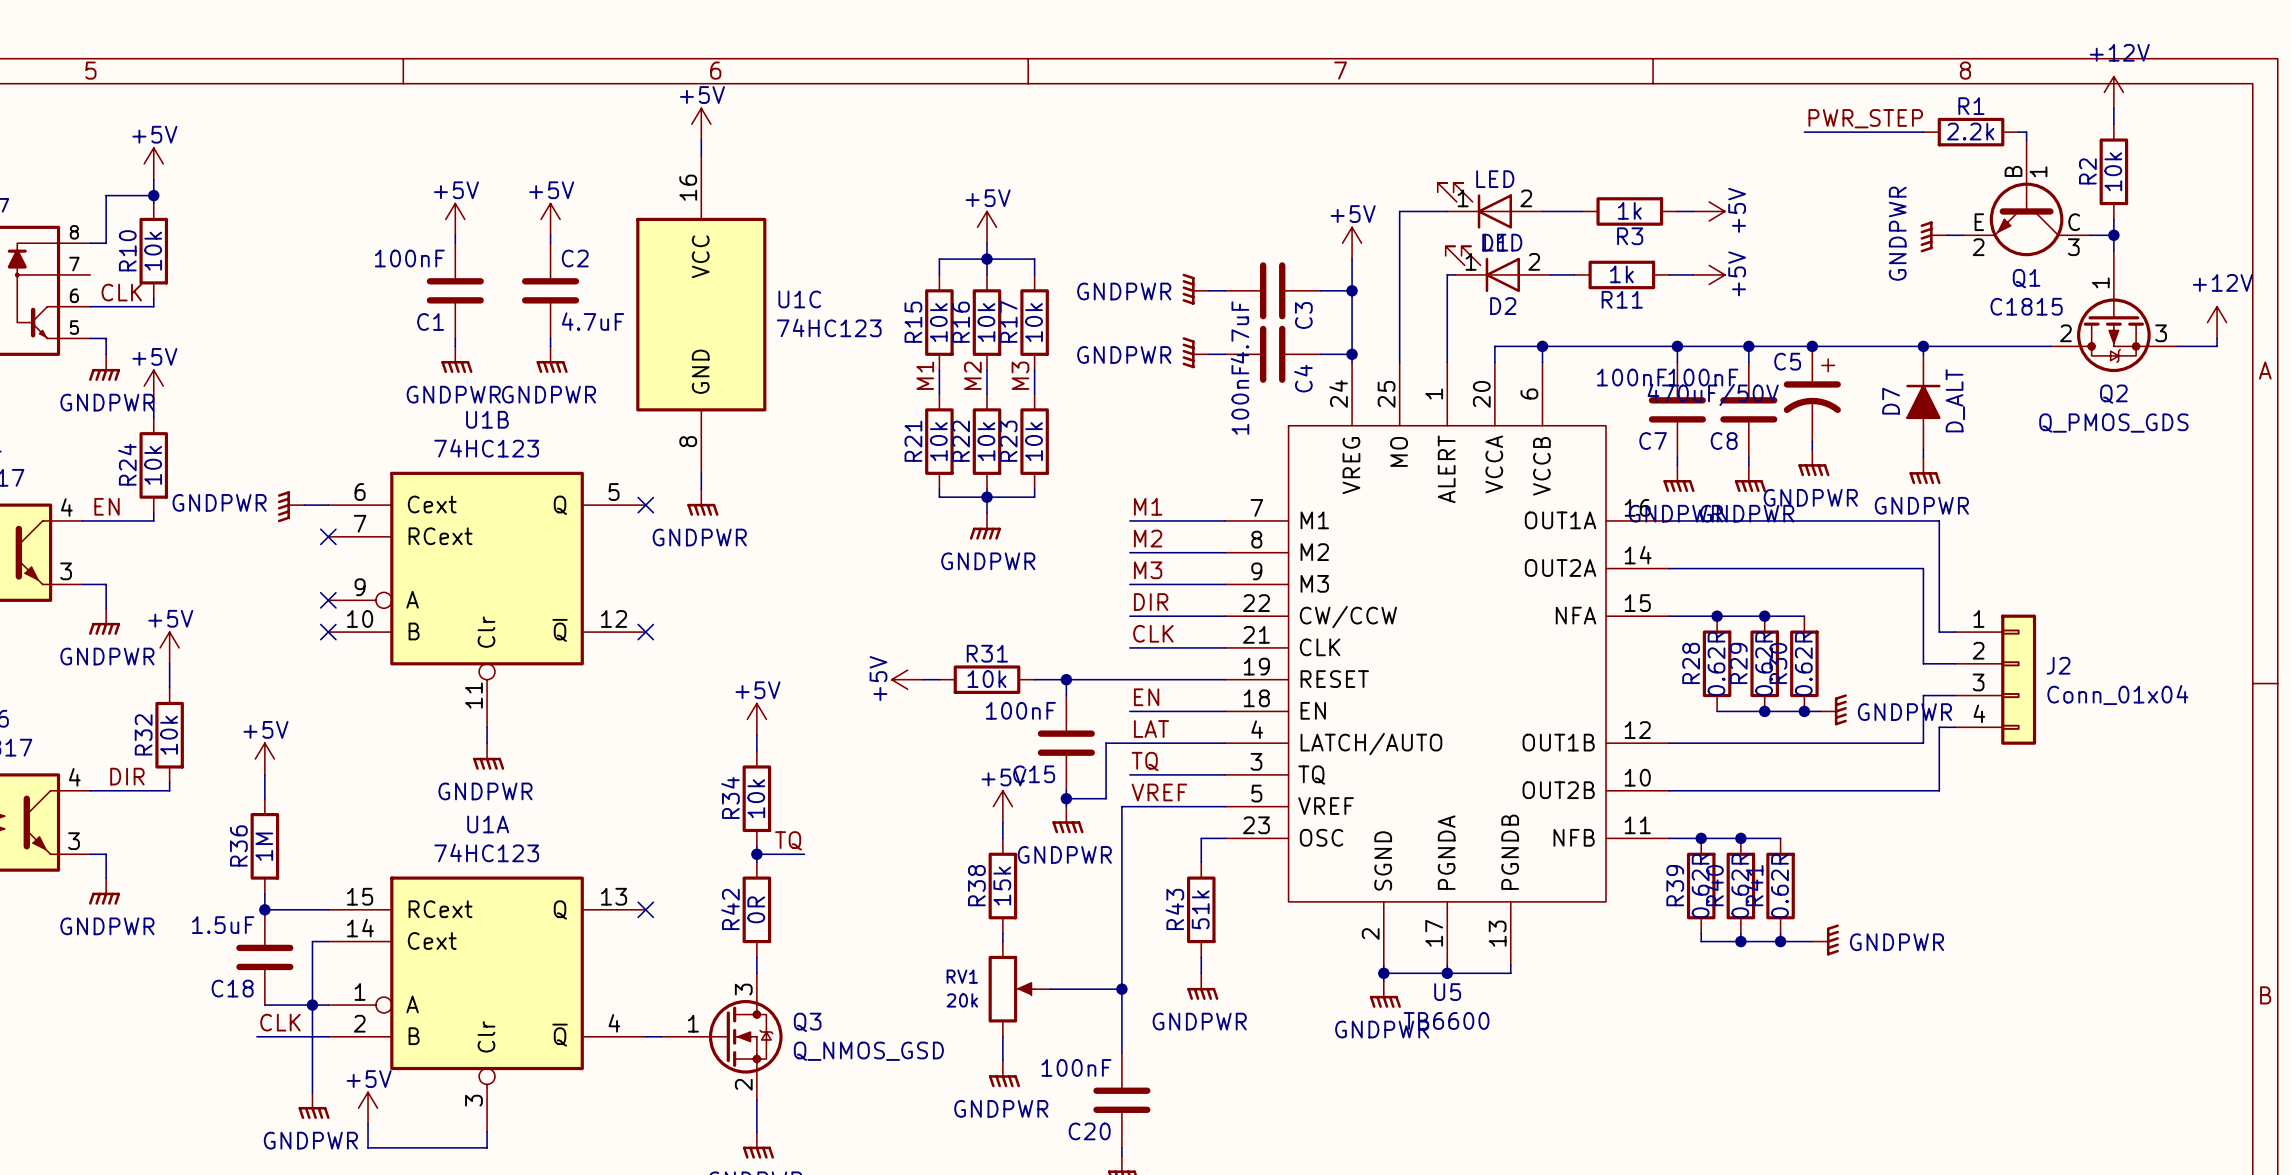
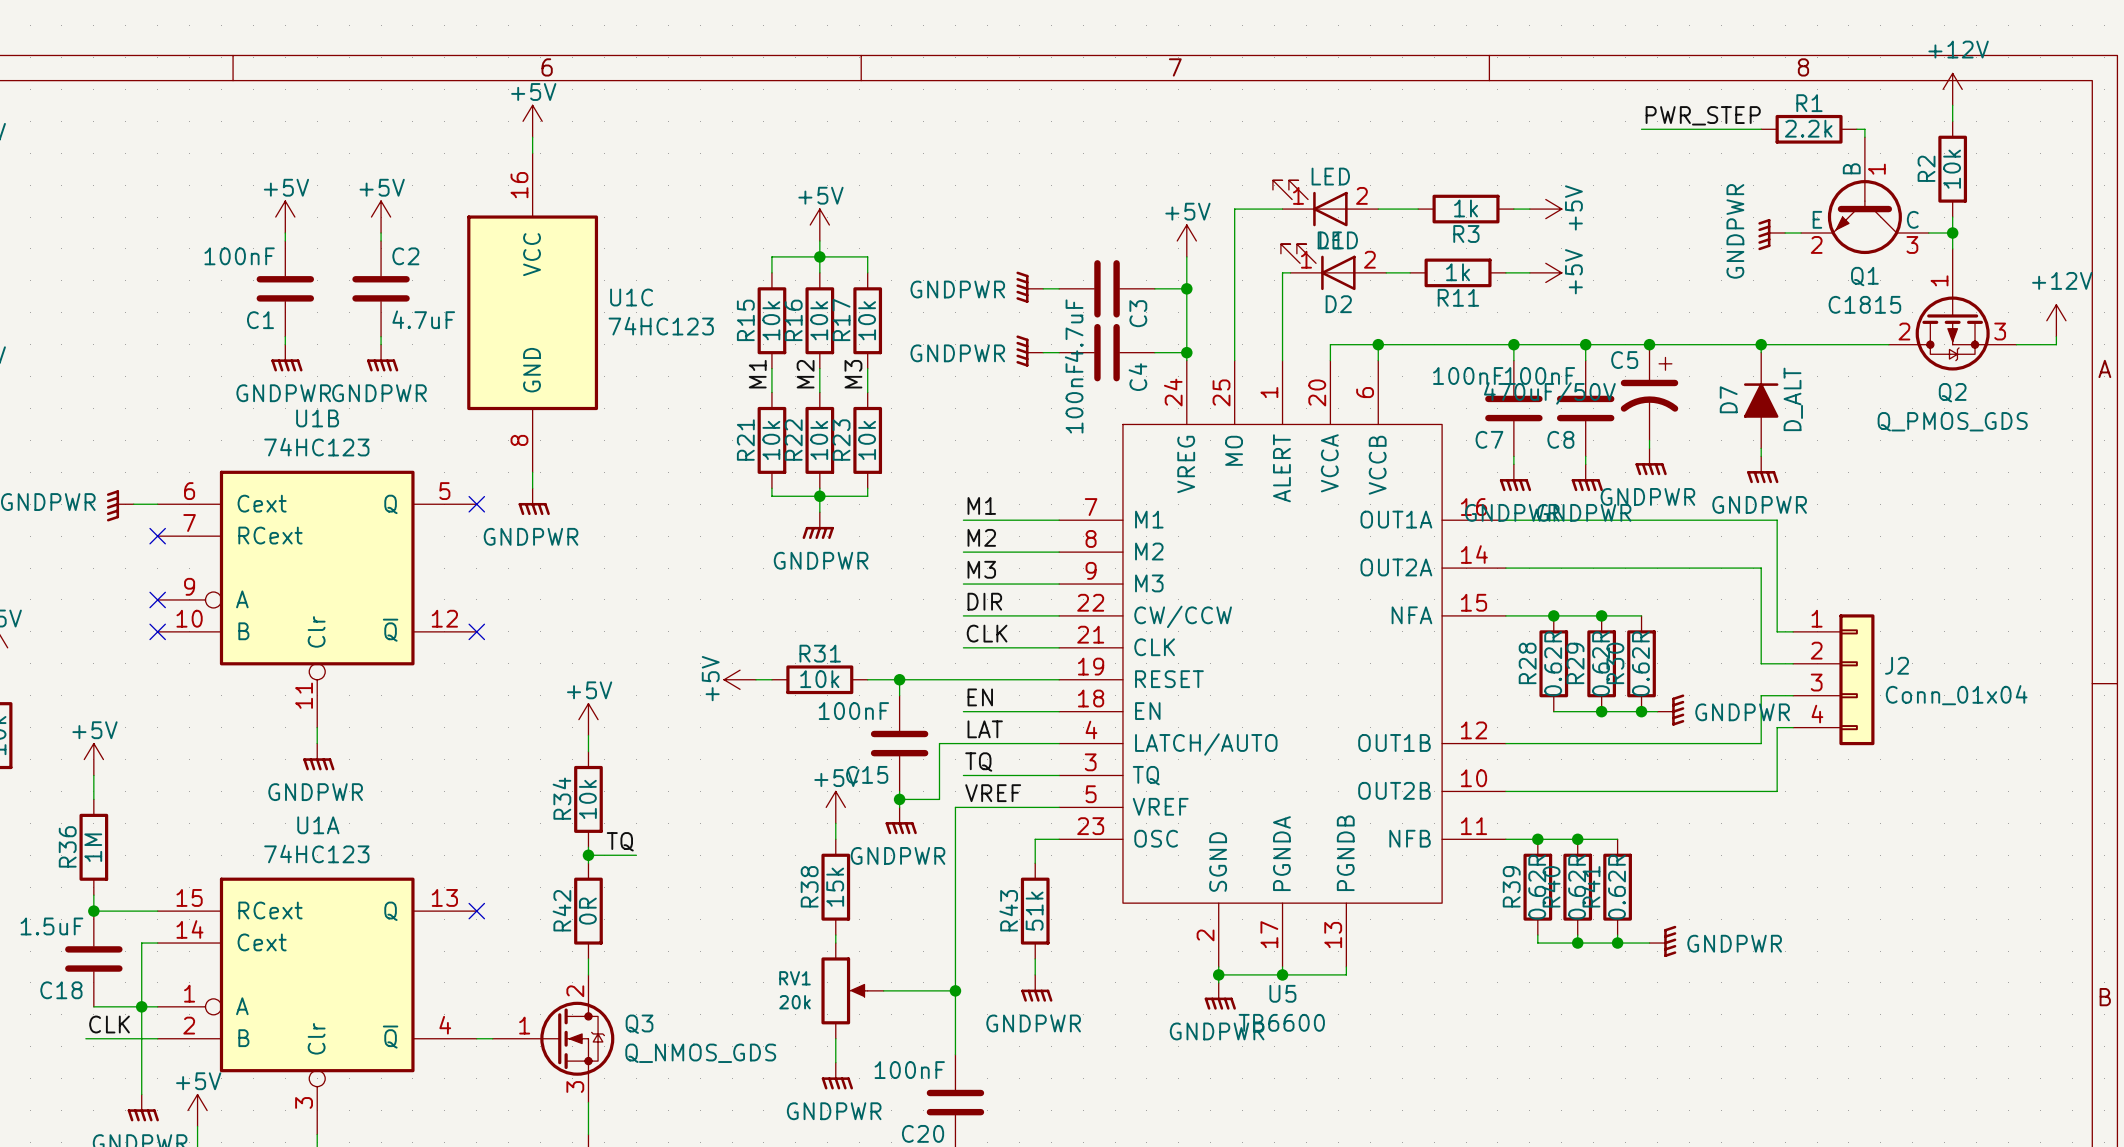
Q3 pin number: 3 (743, 989) -> 2 (575, 991)
Q3 value: Q_NMOS_GSD (868, 1051) -> Q_NMOS_GDS (700, 1053)
Q3 pin number: 2 (743, 1084) -> 3 (575, 1087)

